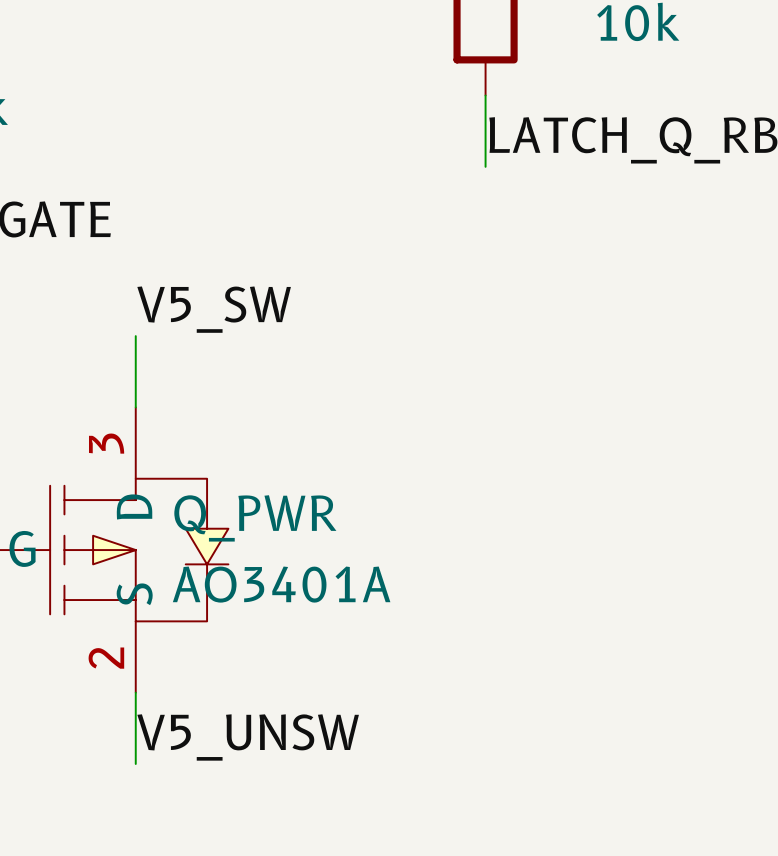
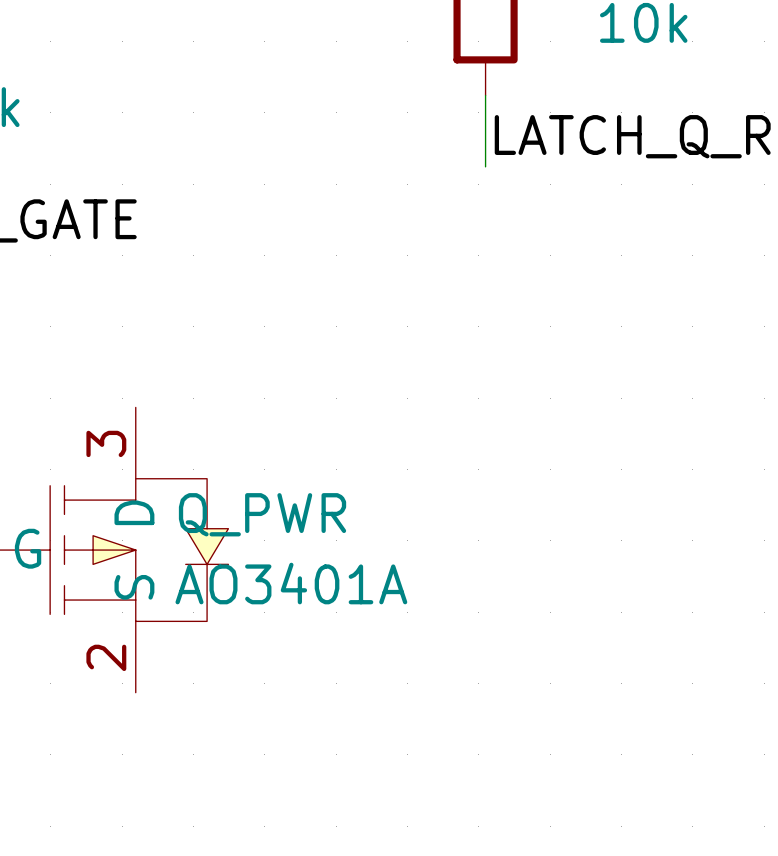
label: V5_SW (214, 309) -> none
wire: (135, 336) (135, 407) -> none
wire: (135, 692) (135, 763) -> none
label: V5_UNSW (248, 737) -> none

